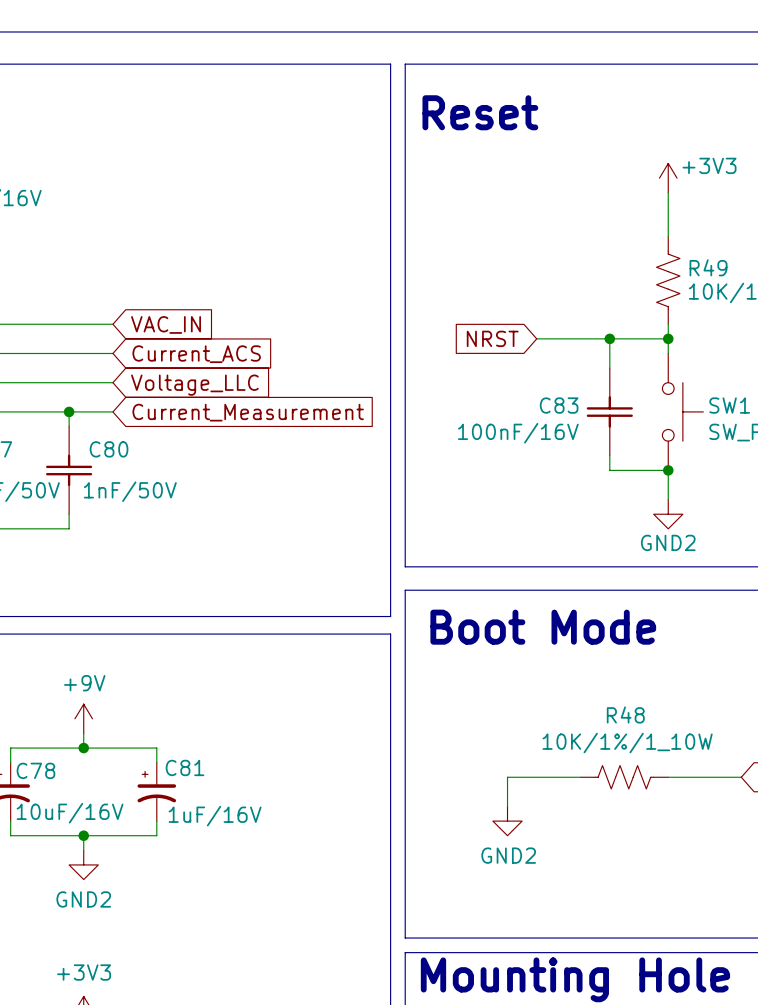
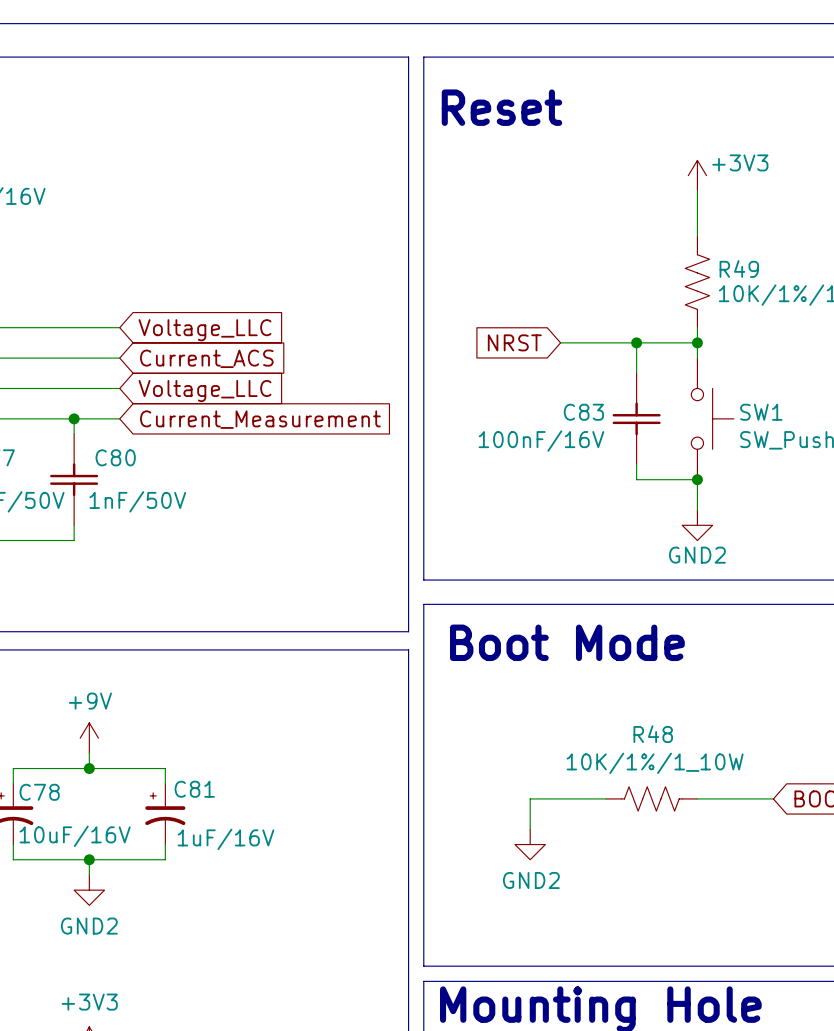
global label: VAC_IN (166, 324) -> Voltage_LLC (205, 330)

